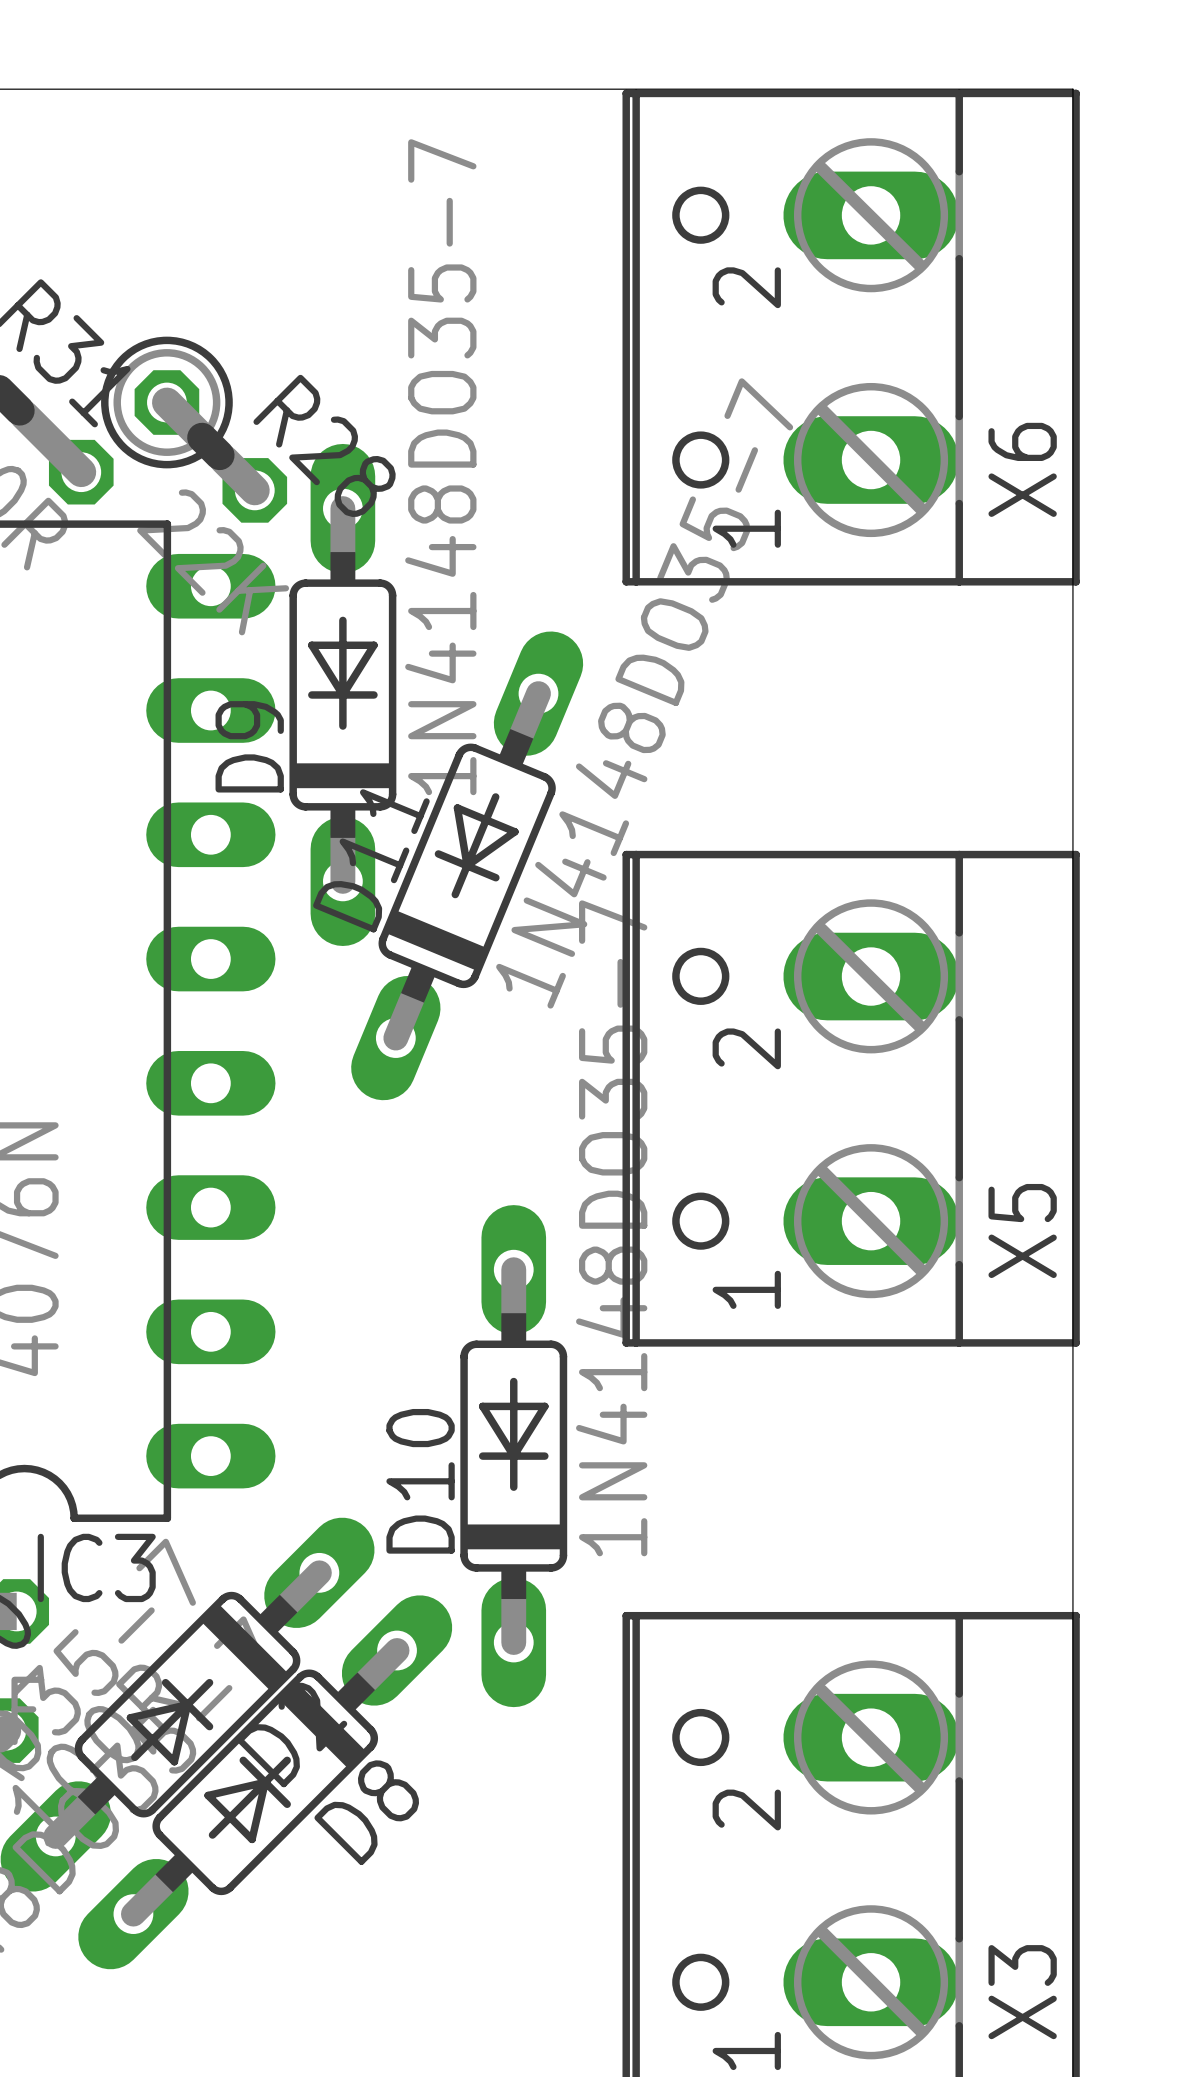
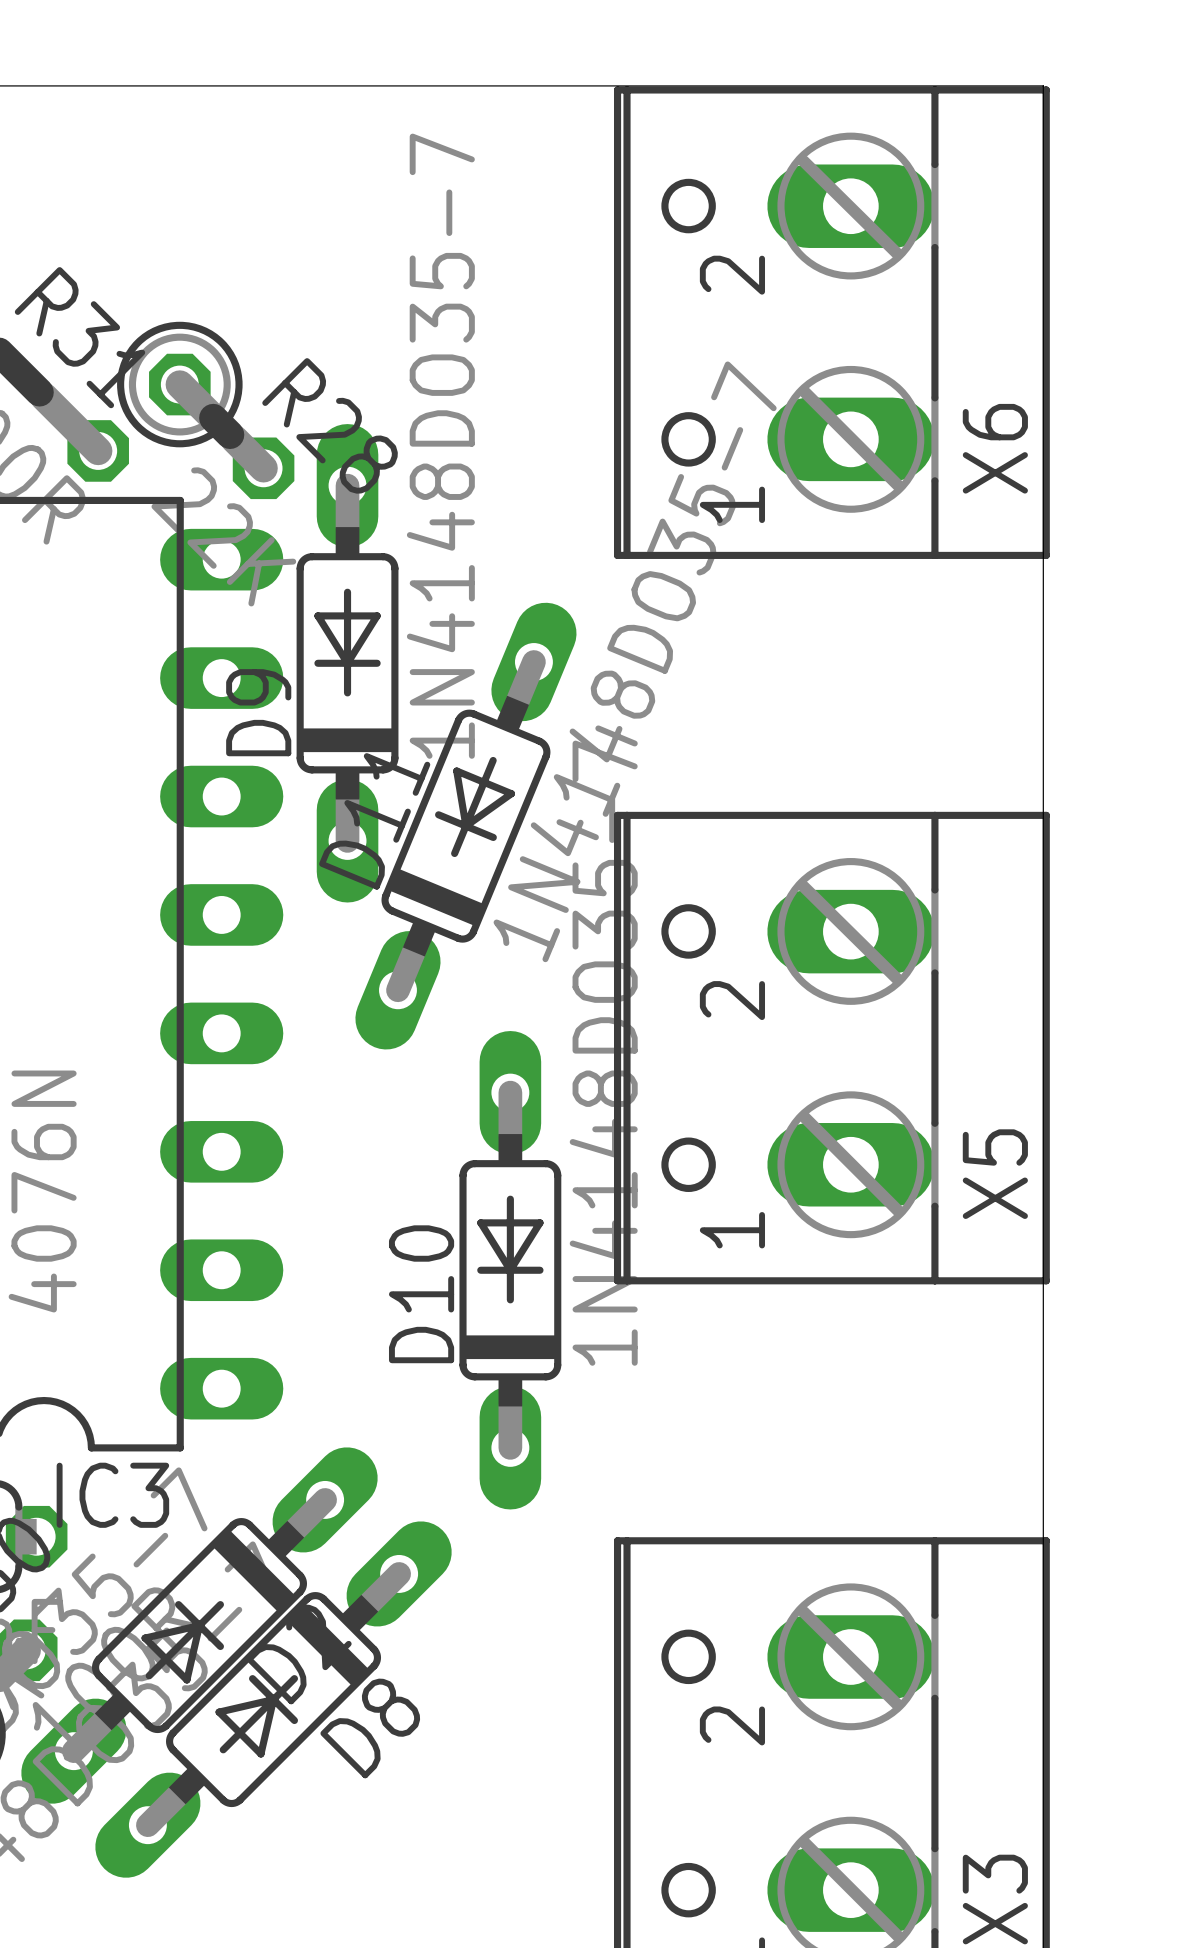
D10 position: (513, 1456) -> (510, 1270)

